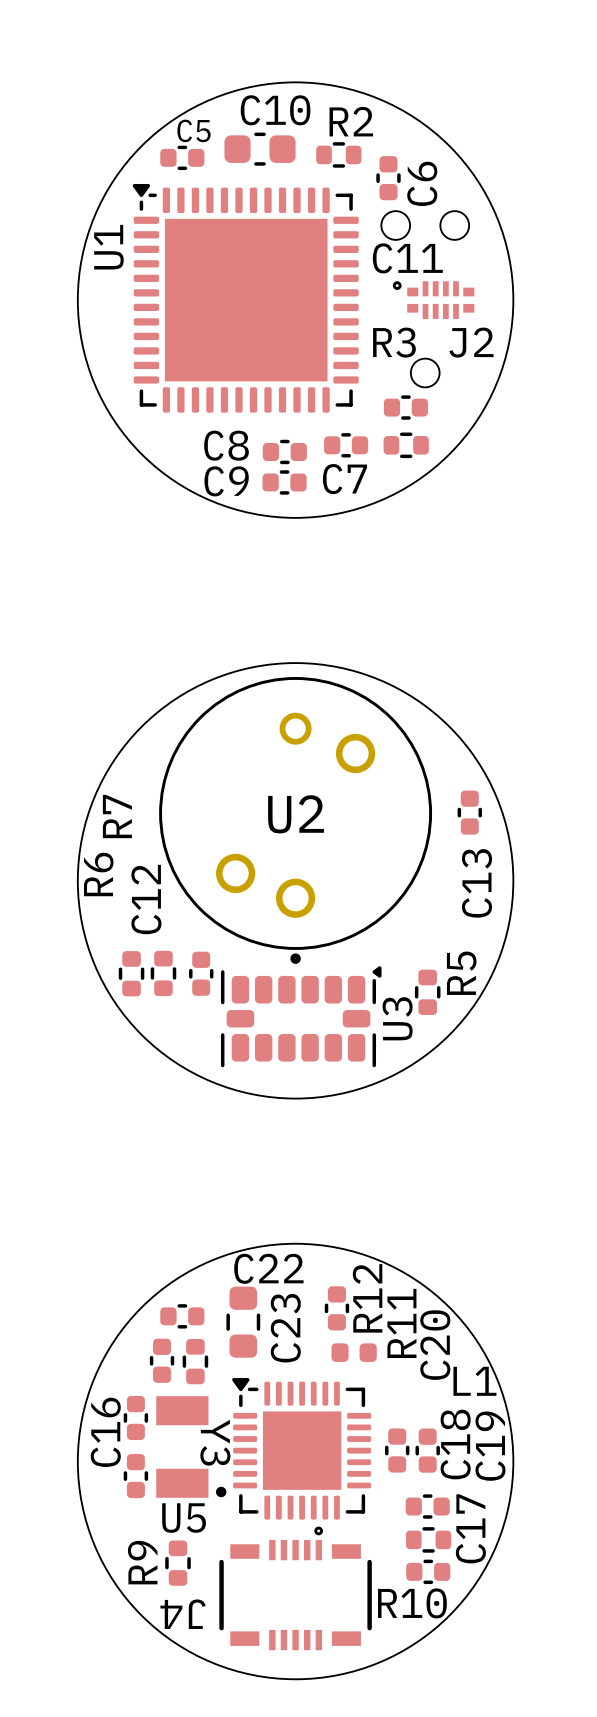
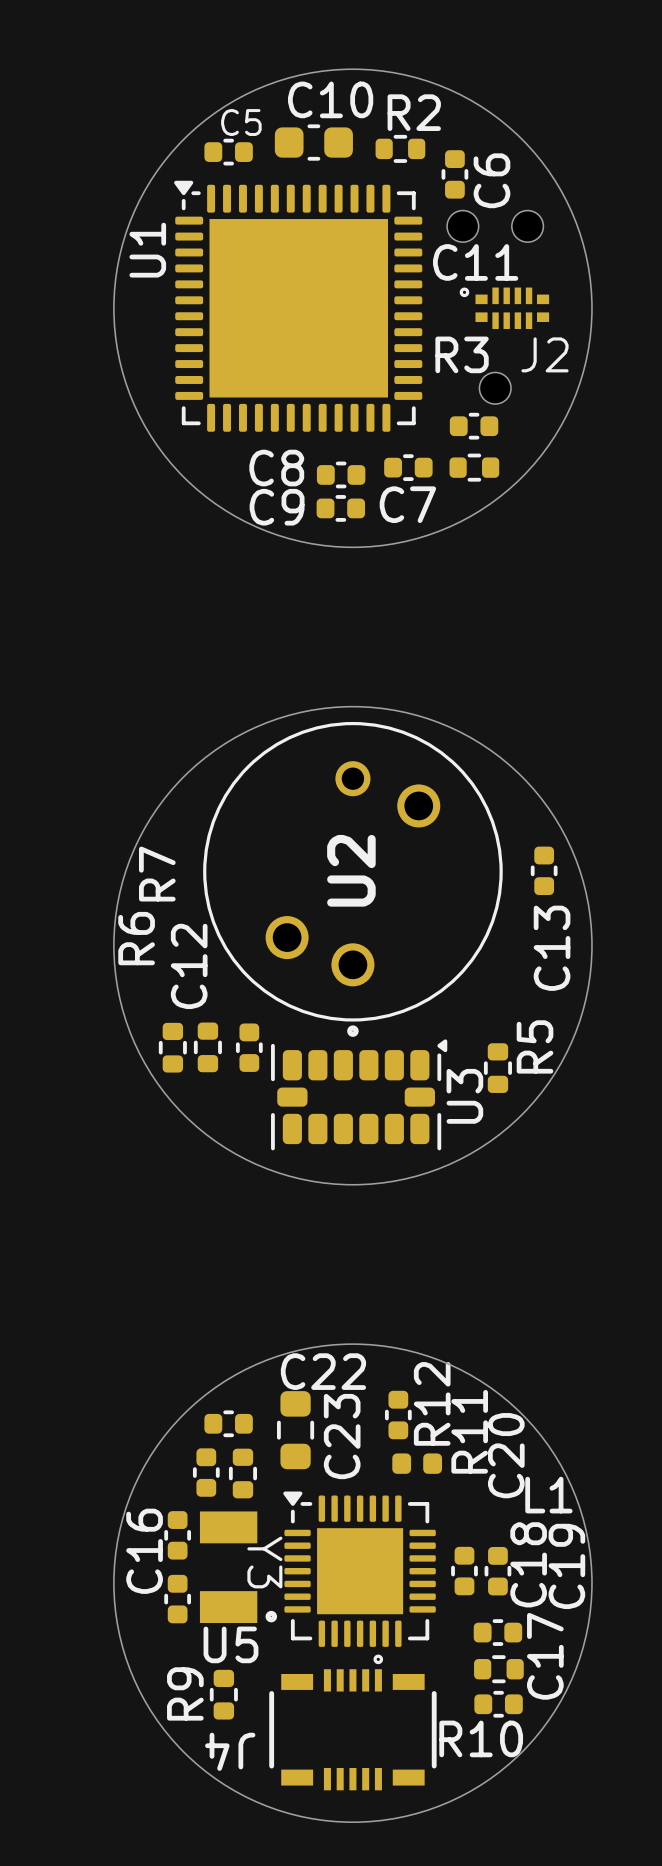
U2 name rotation: 0° (296, 814) -> 90° counterclockwise (351, 870)

